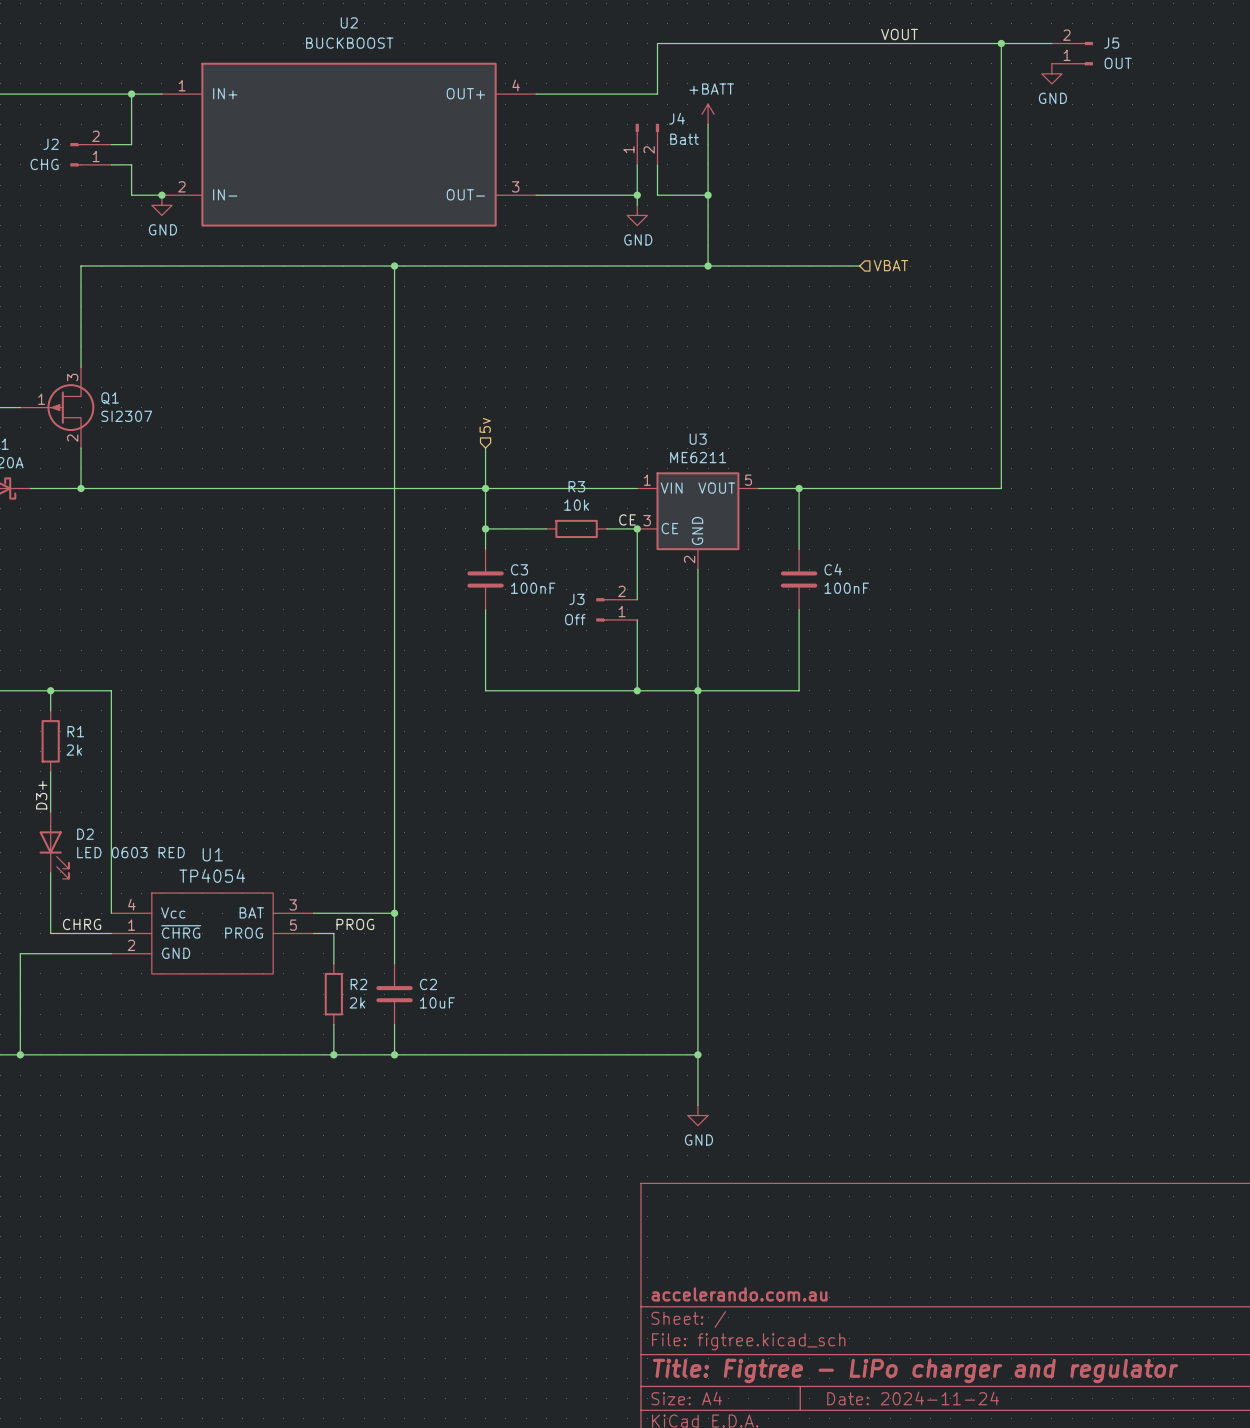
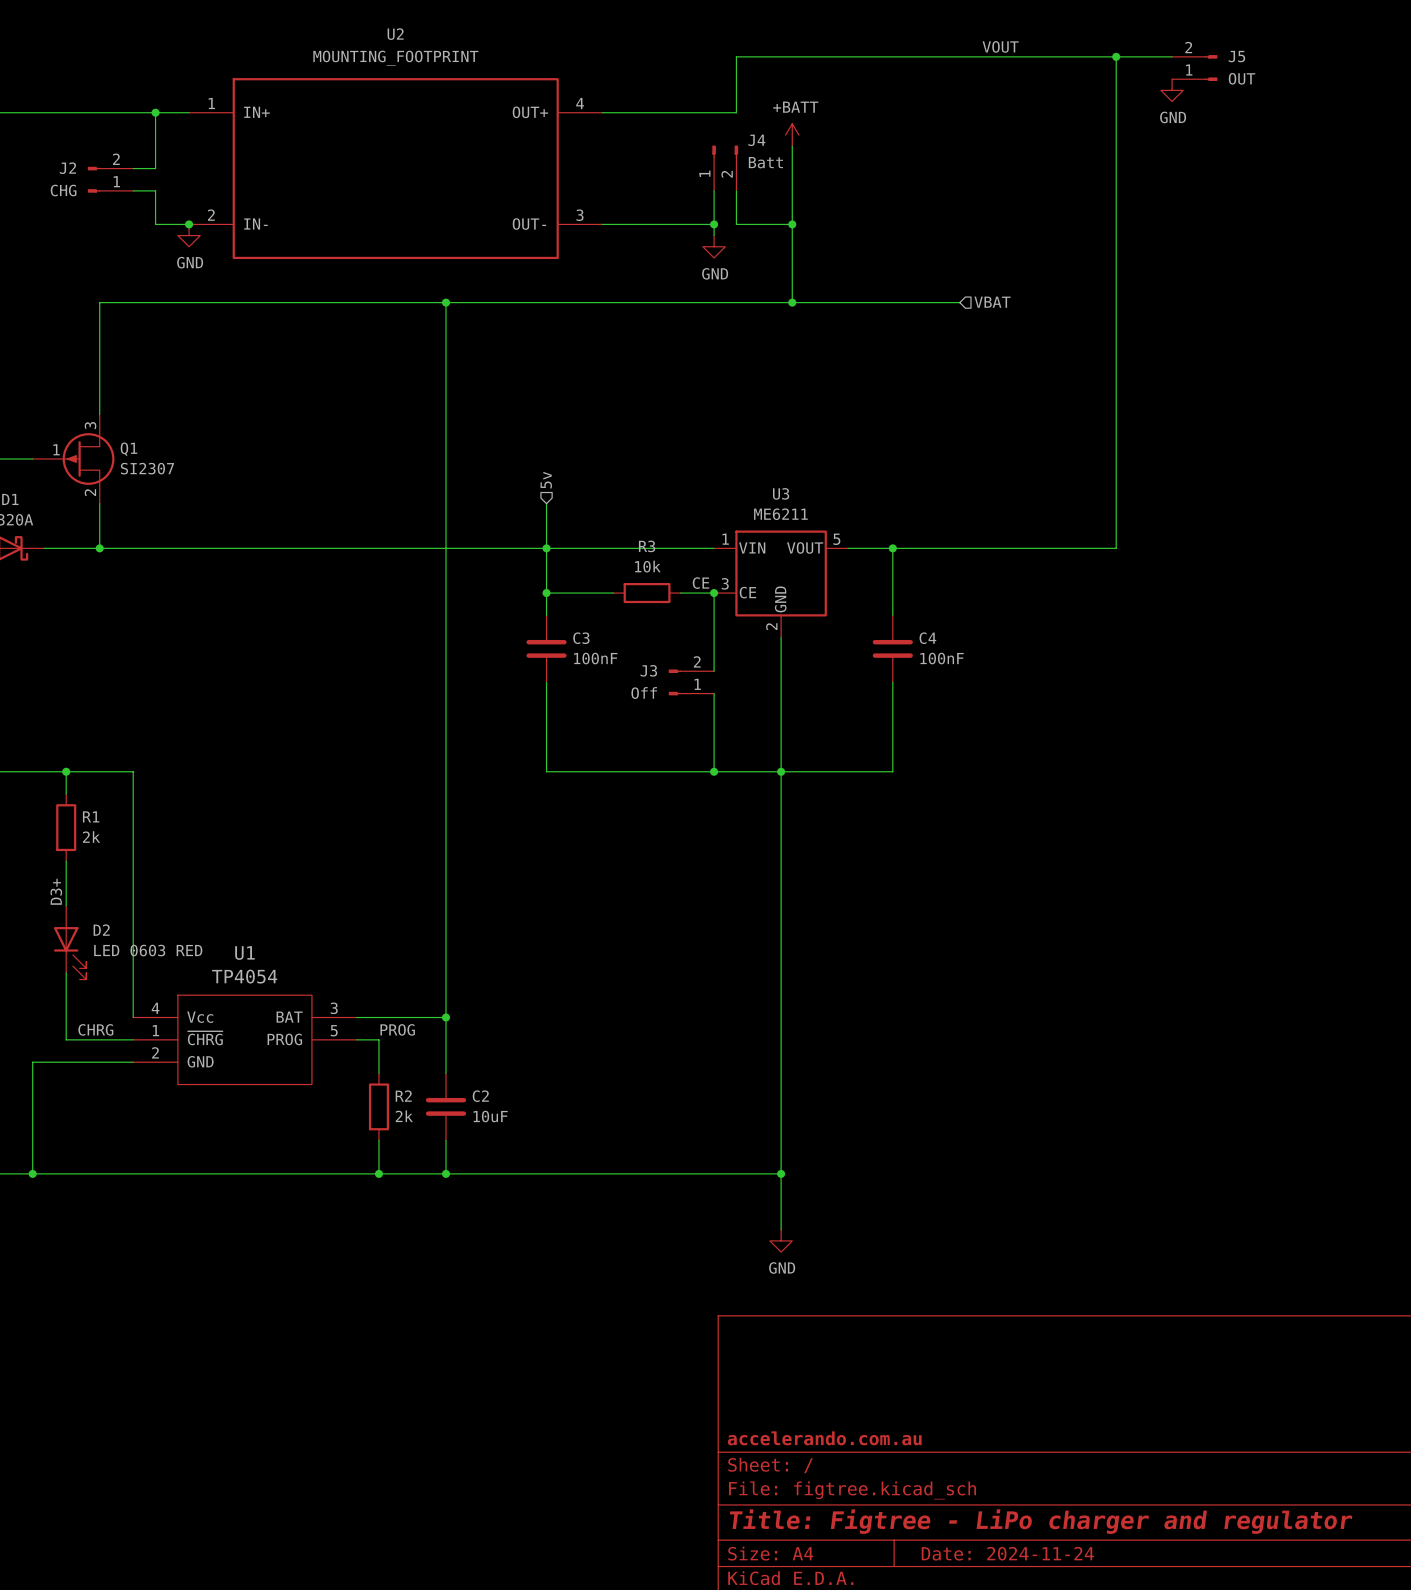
U2 value: BUCKBOOST (349, 43) -> MOUNTING_FOOTPRINT (395, 58)

